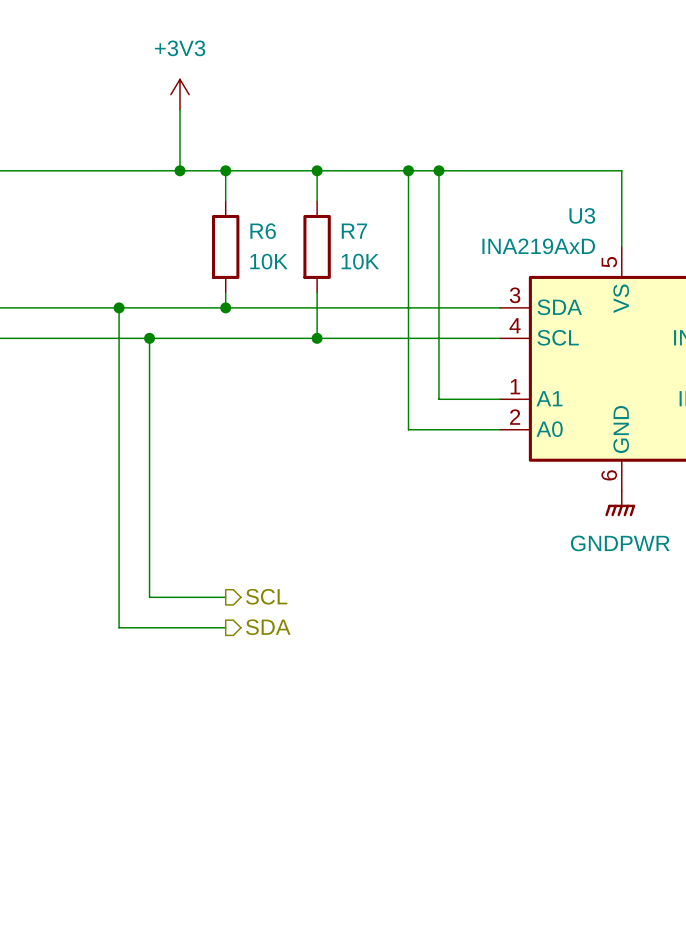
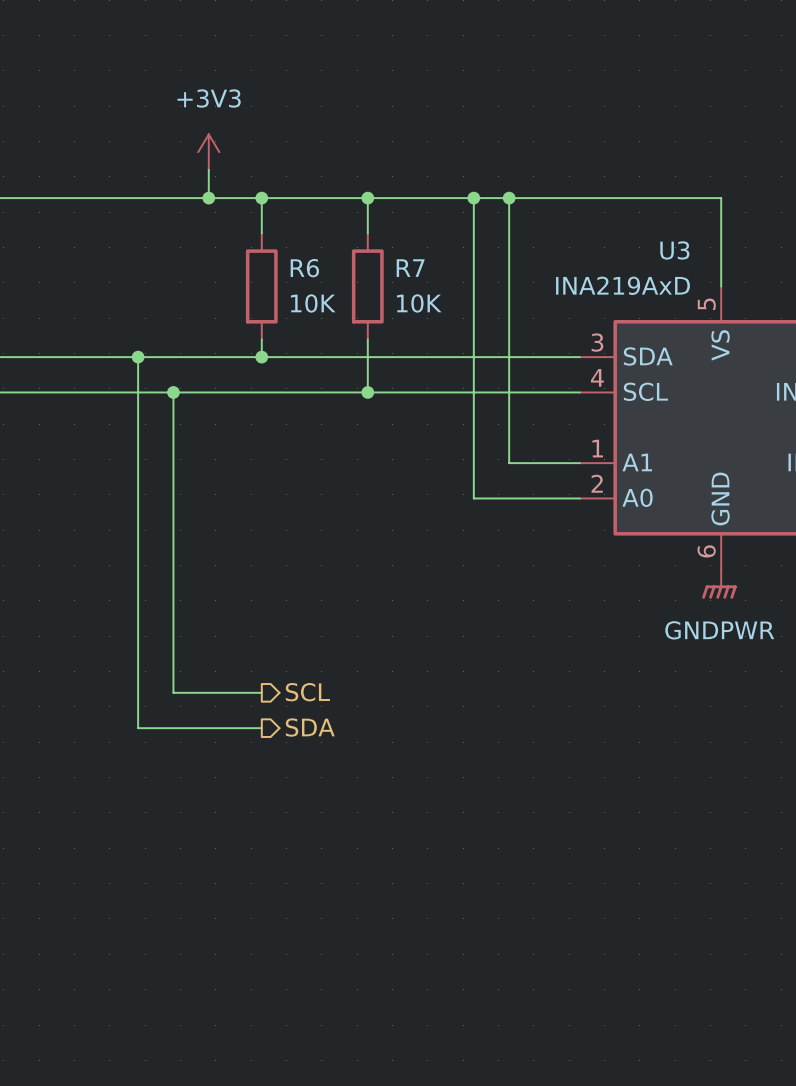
power symbol position: +3V3 (180, 94) -> +3V3 (208, 152)

